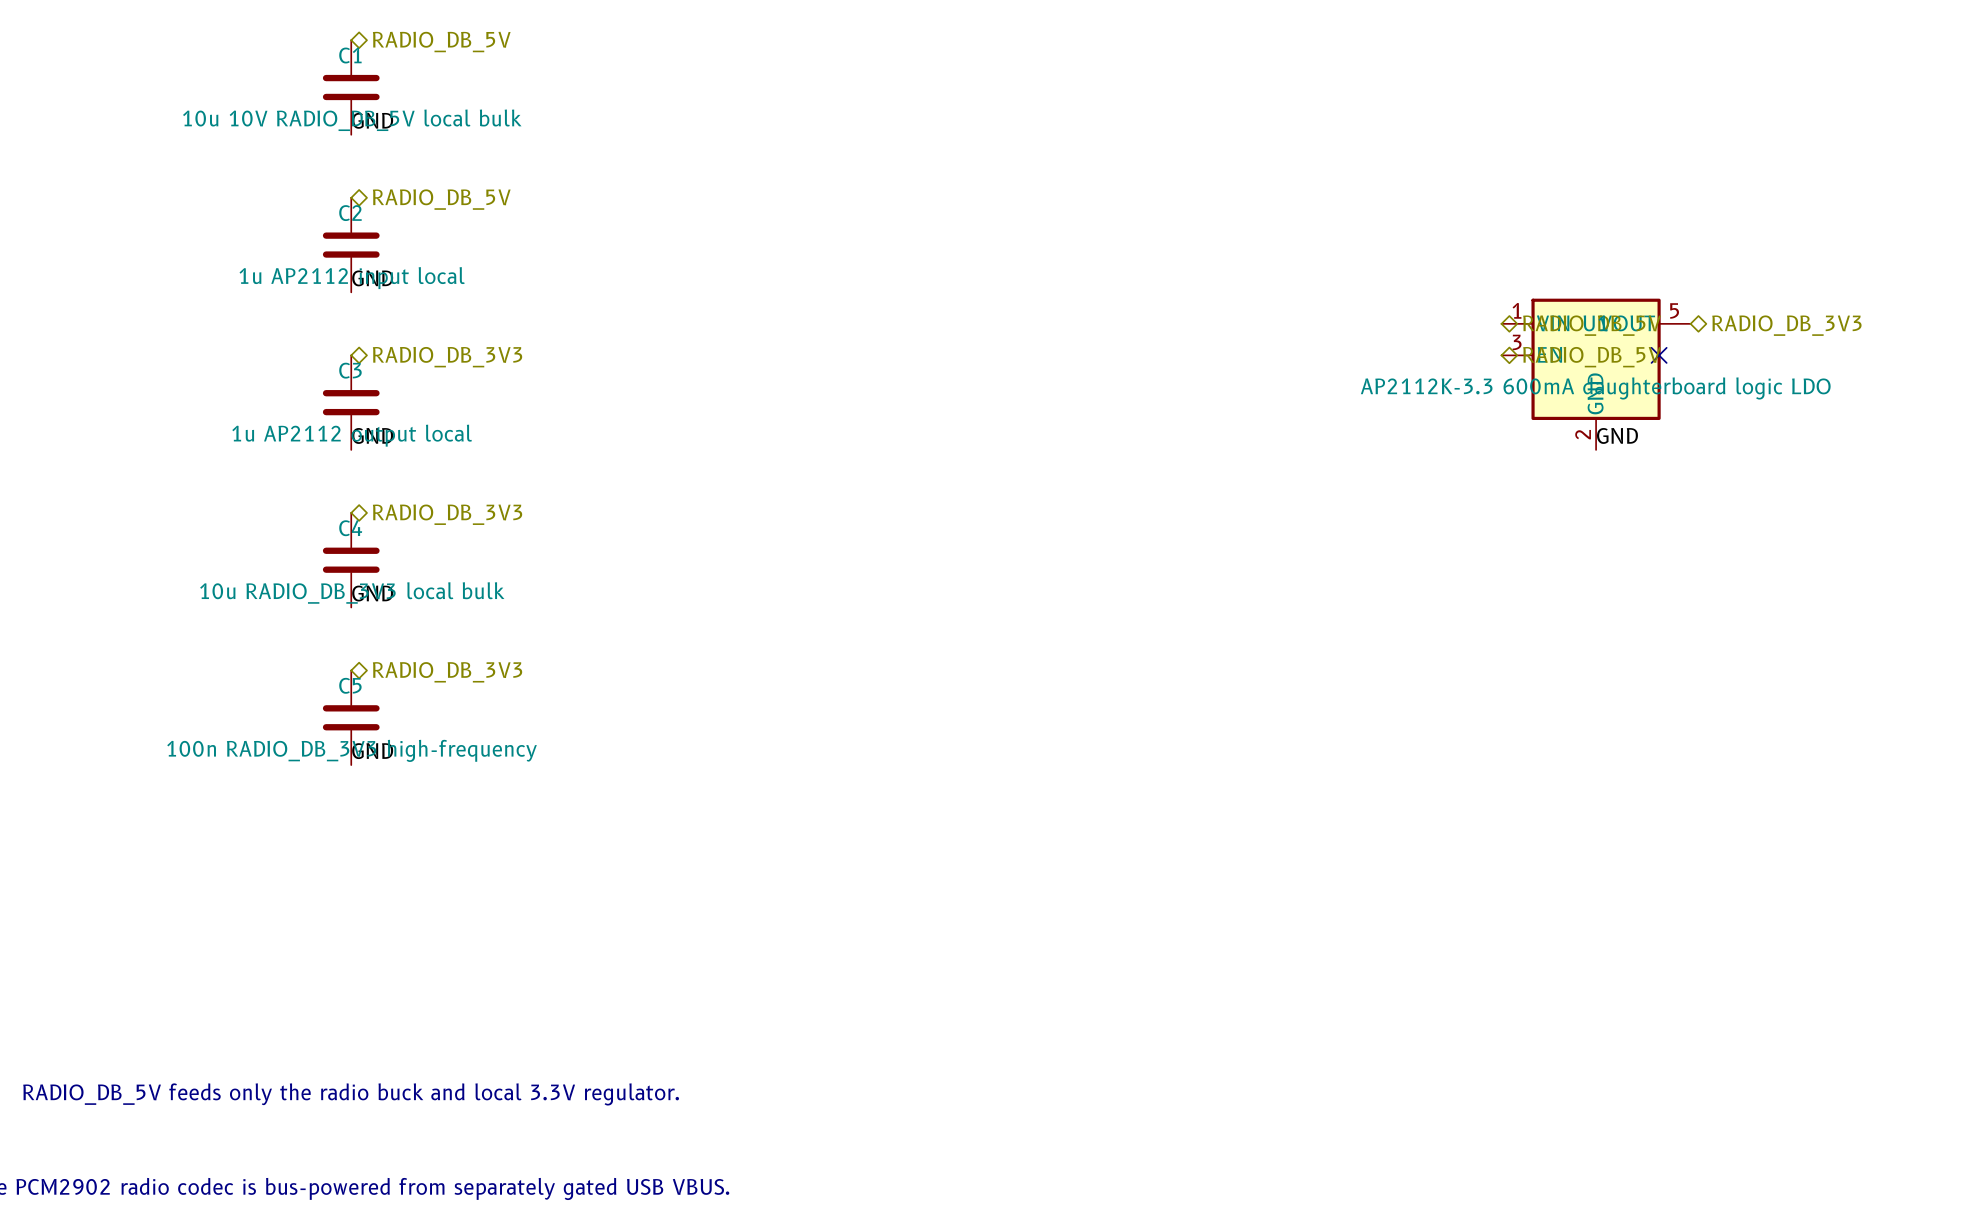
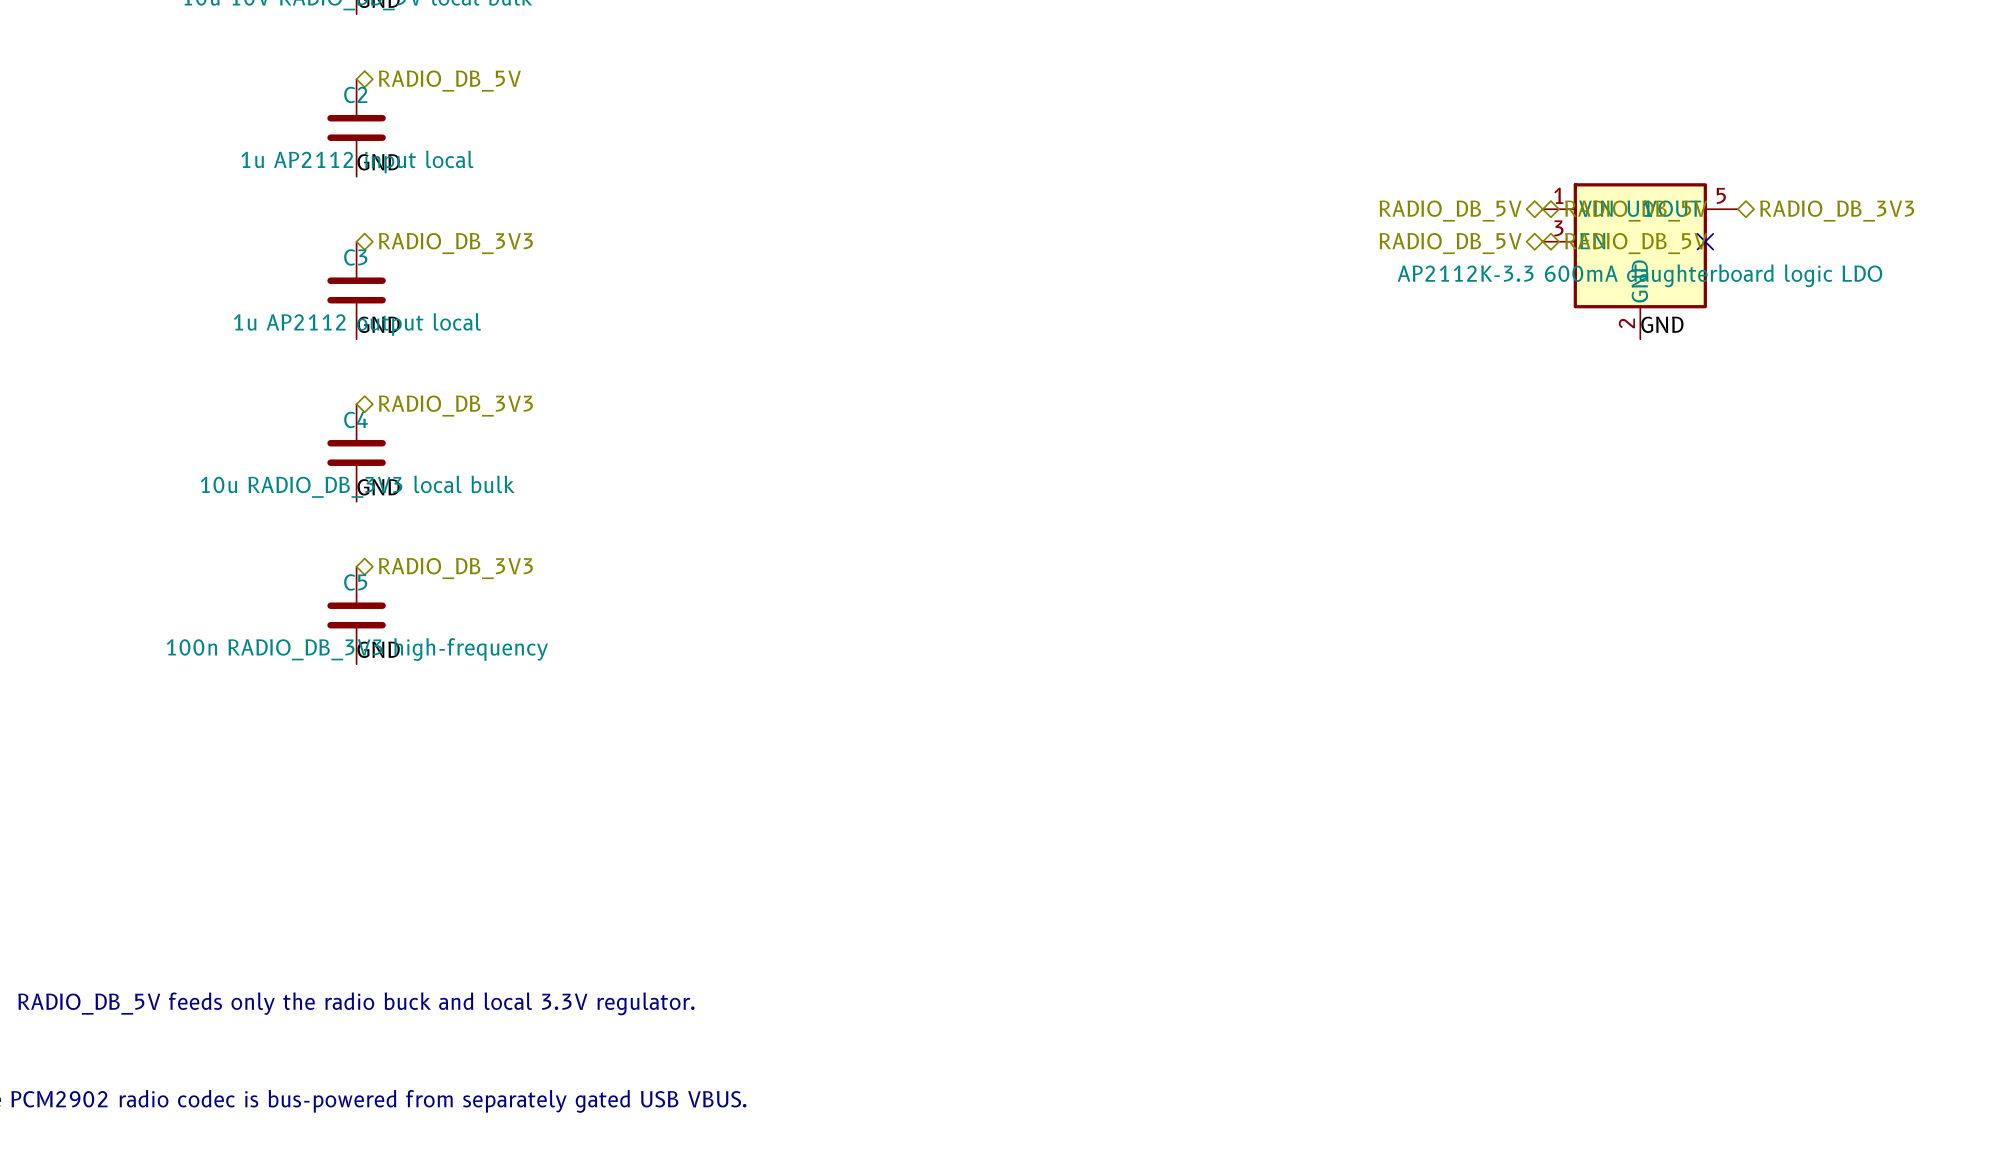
hierarchical label: none -> RADIO_DB_5V (1450, 211)
hierarchical label: none -> RADIO_DB_5V (1450, 243)

